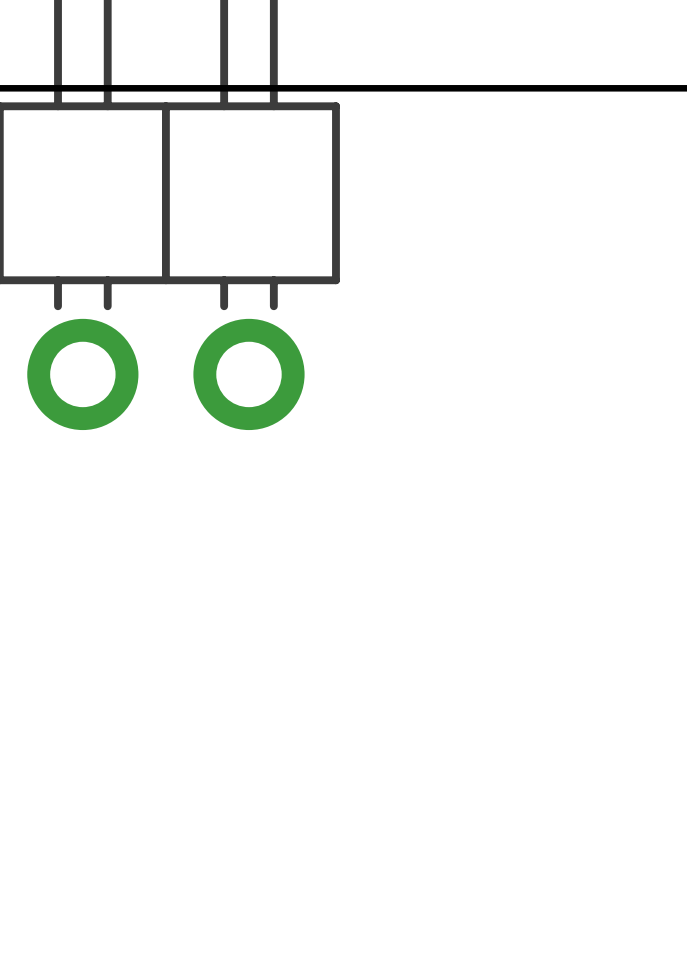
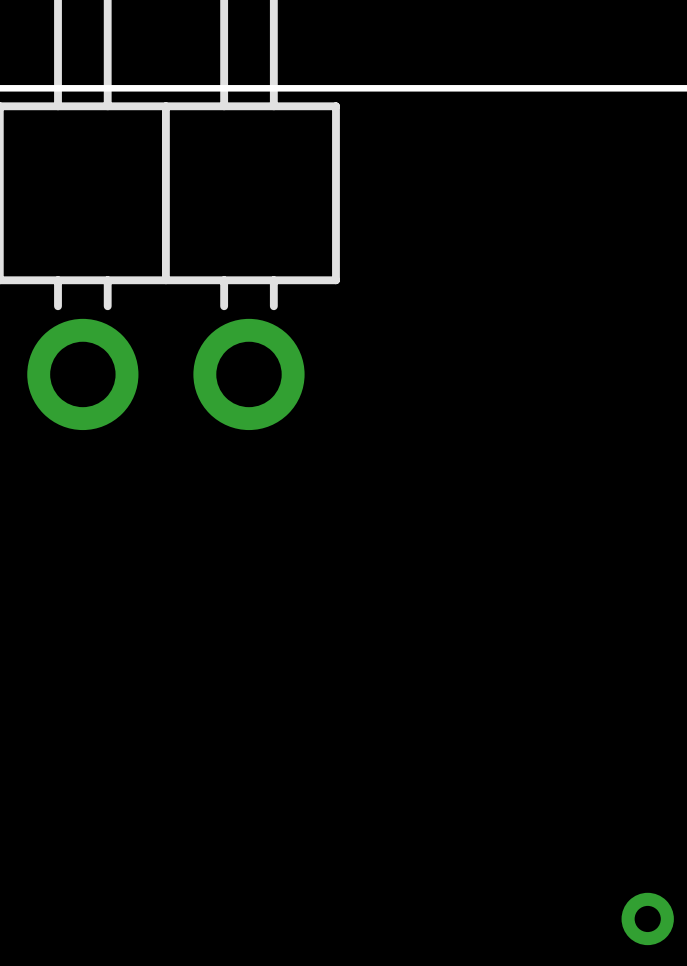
via: none -> (647, 918)

